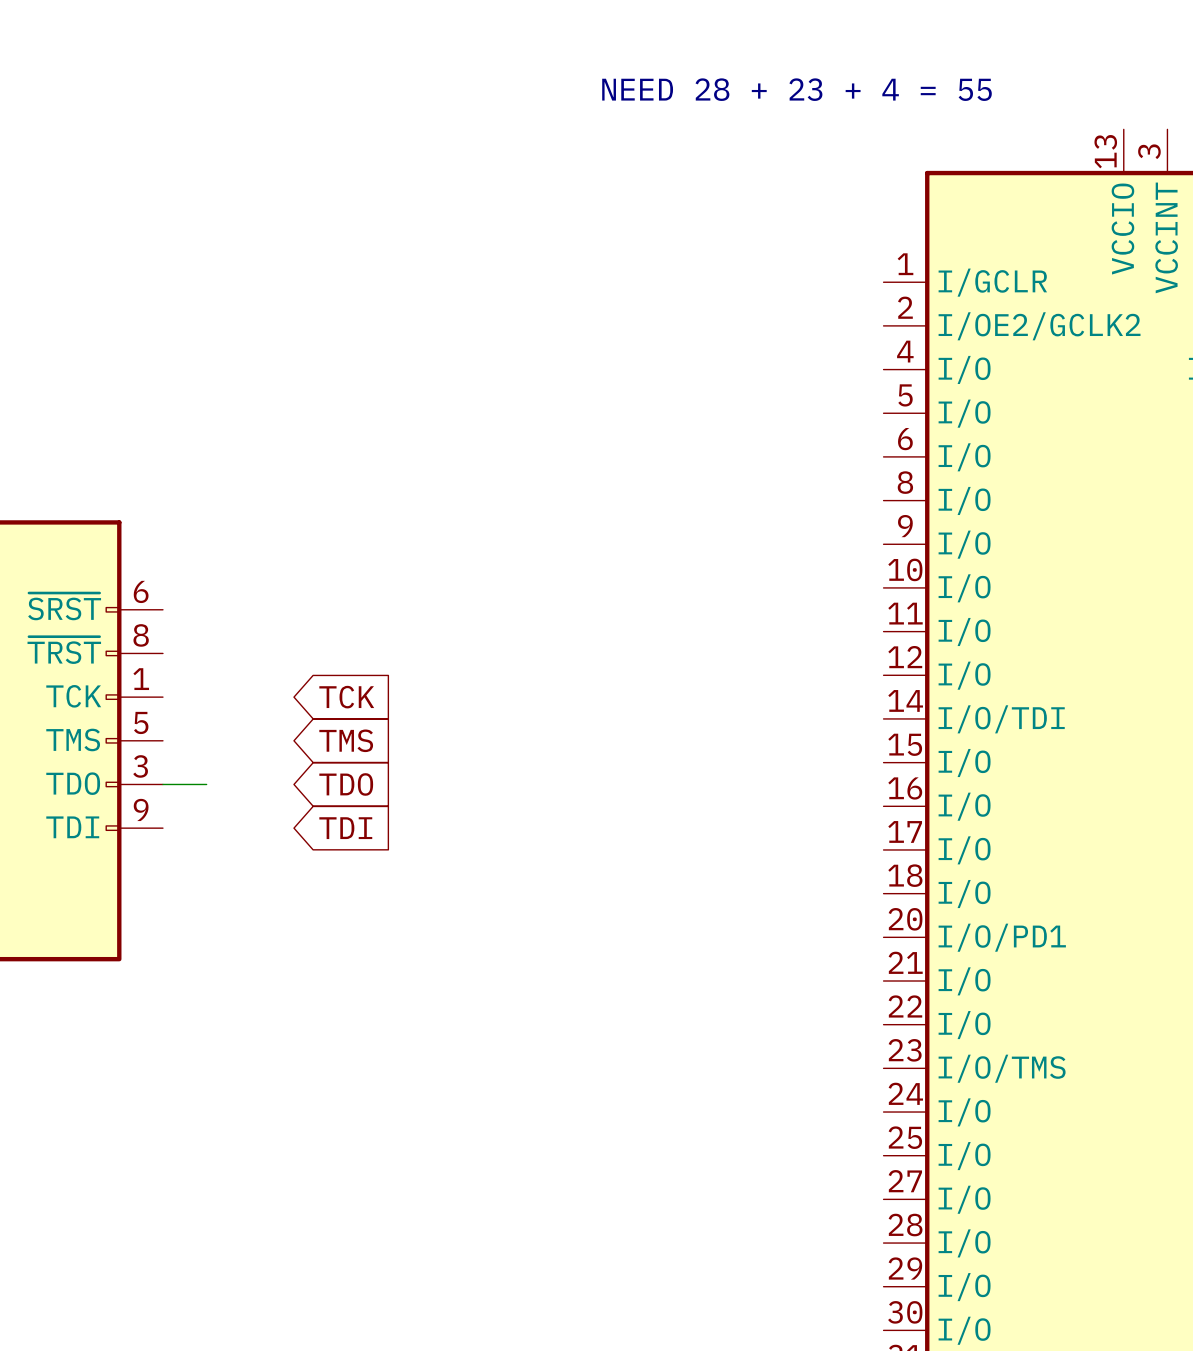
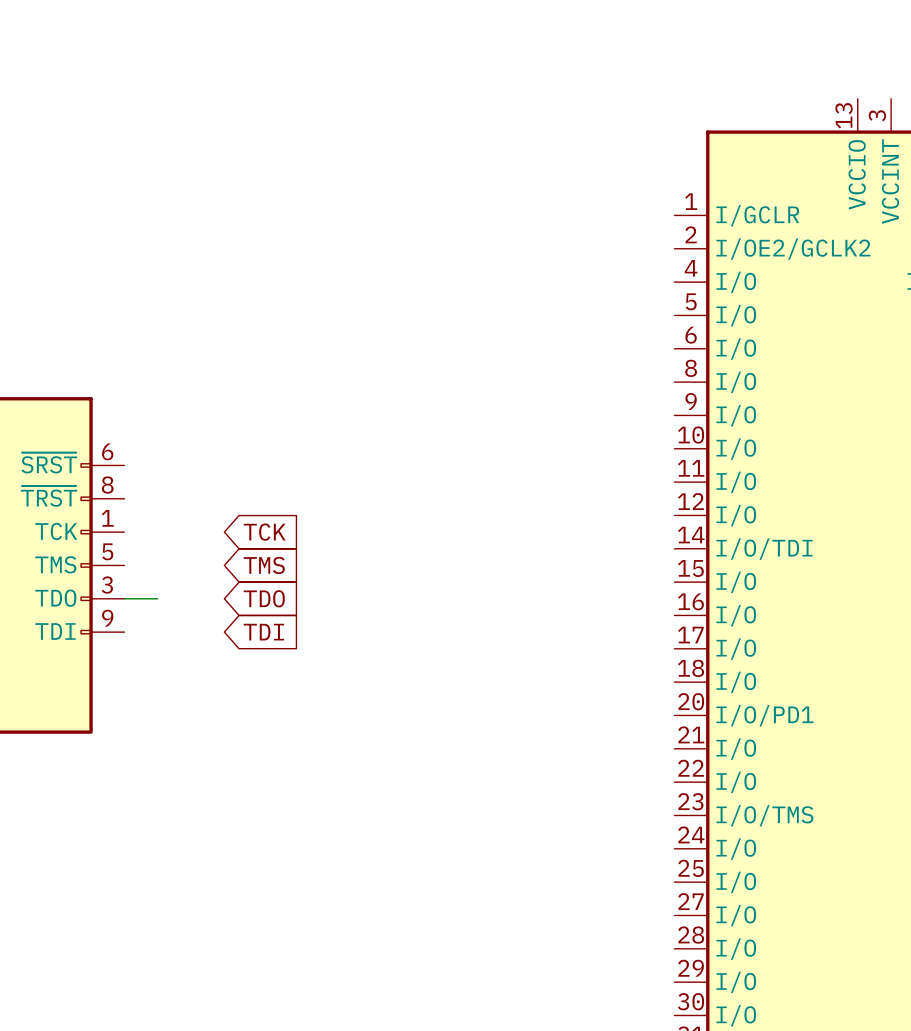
text: NEED 28 + 23 + 4 = 55 (797, 89) -> none

